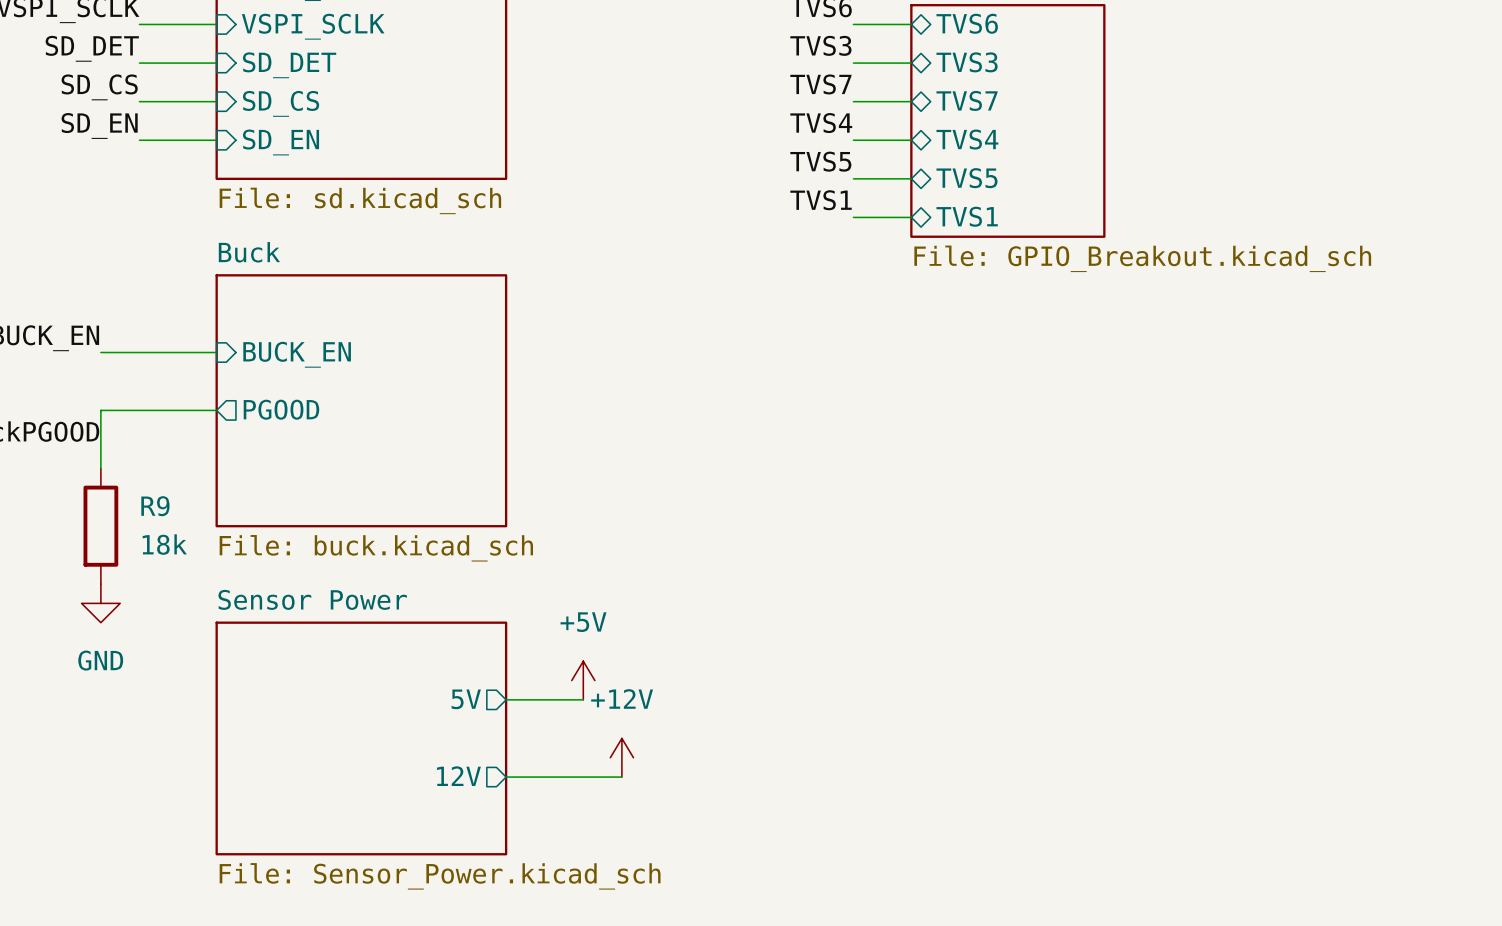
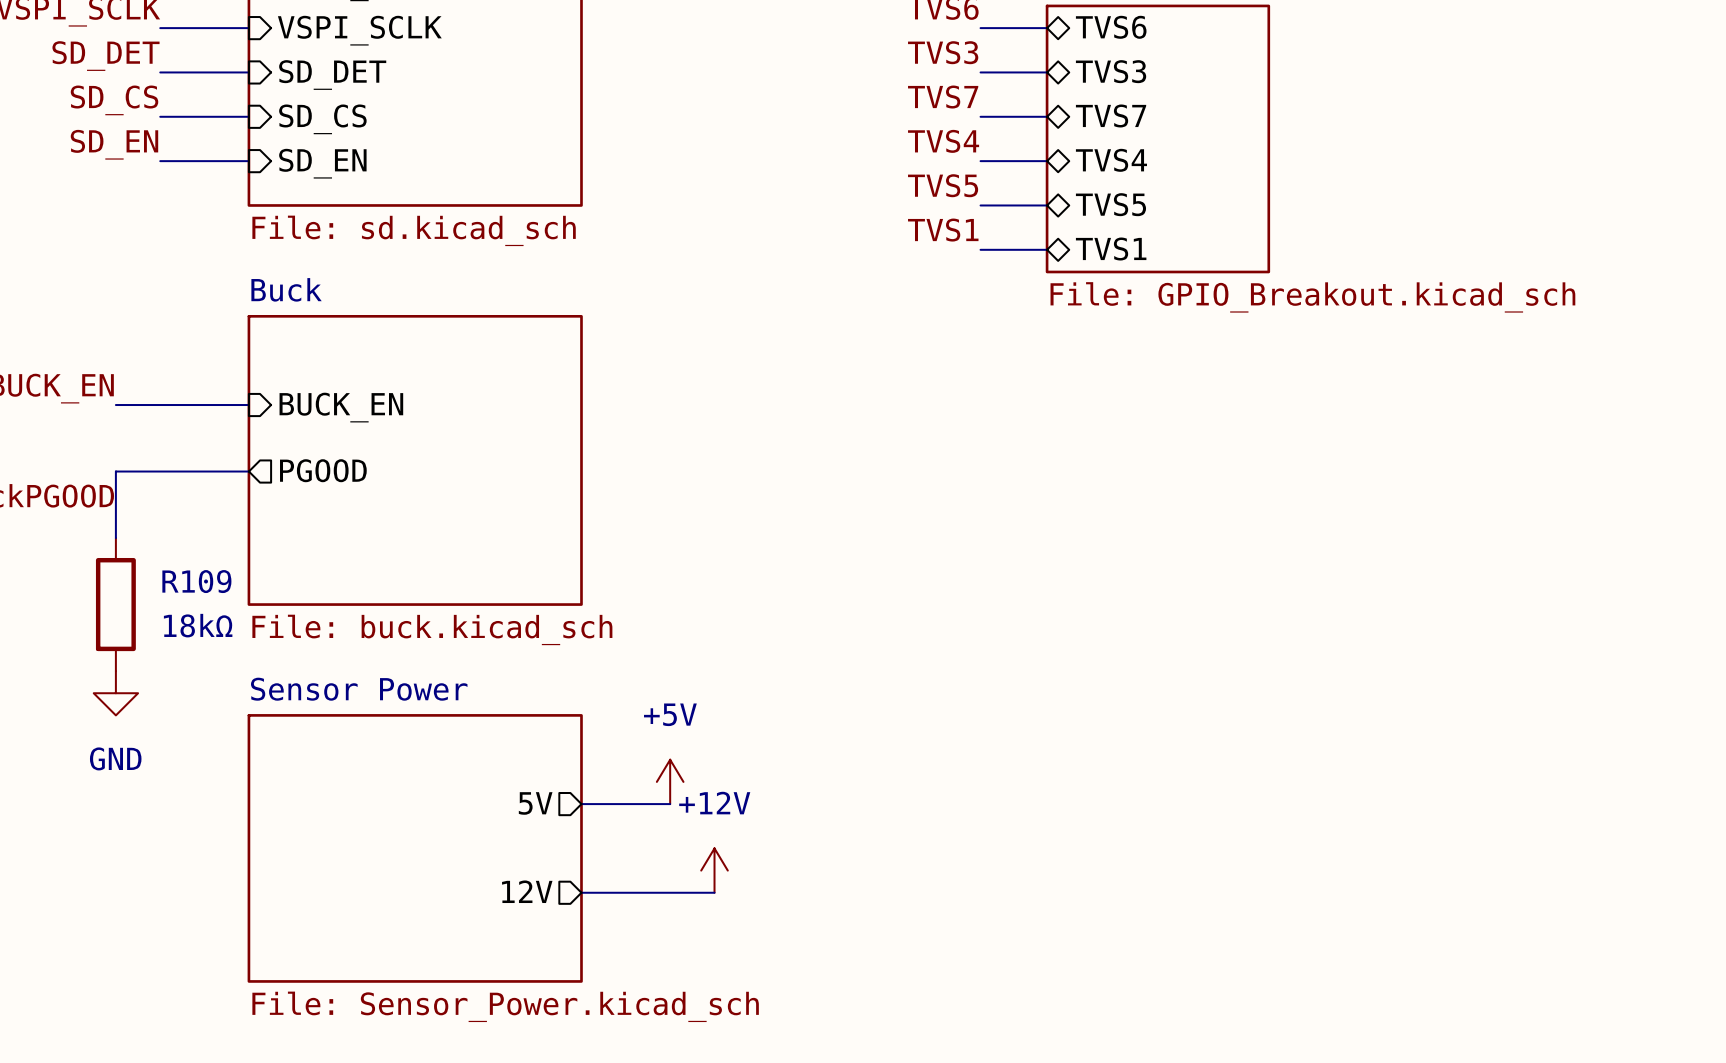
R9 name: R9 (155, 506) -> R109 (196, 581)
R9 value: 18k (164, 544) -> 18kΩ (198, 625)

